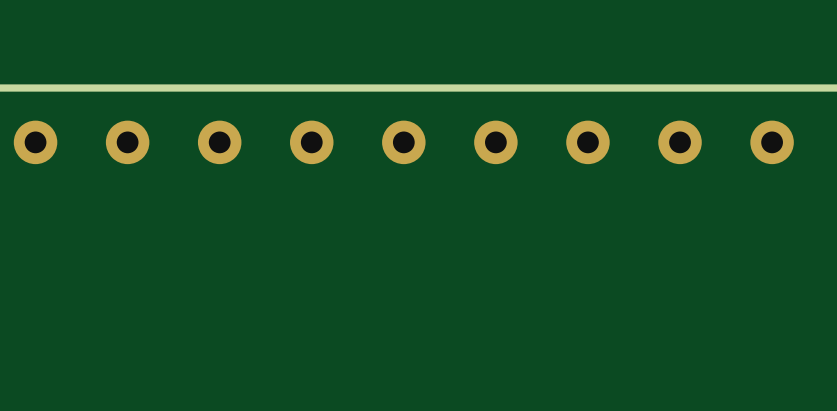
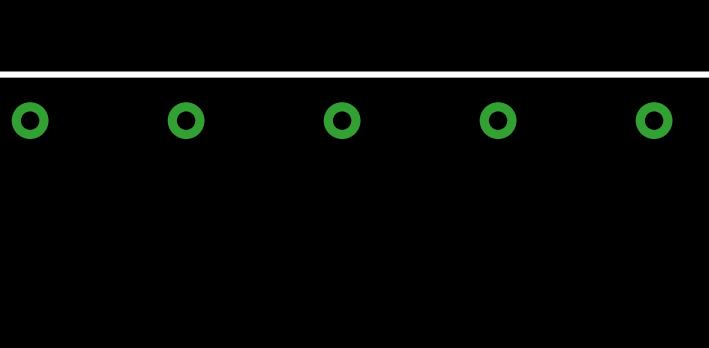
via: (127, 142) -> none
via: (311, 142) -> none
via: (495, 142) -> none
via: (680, 142) -> none

